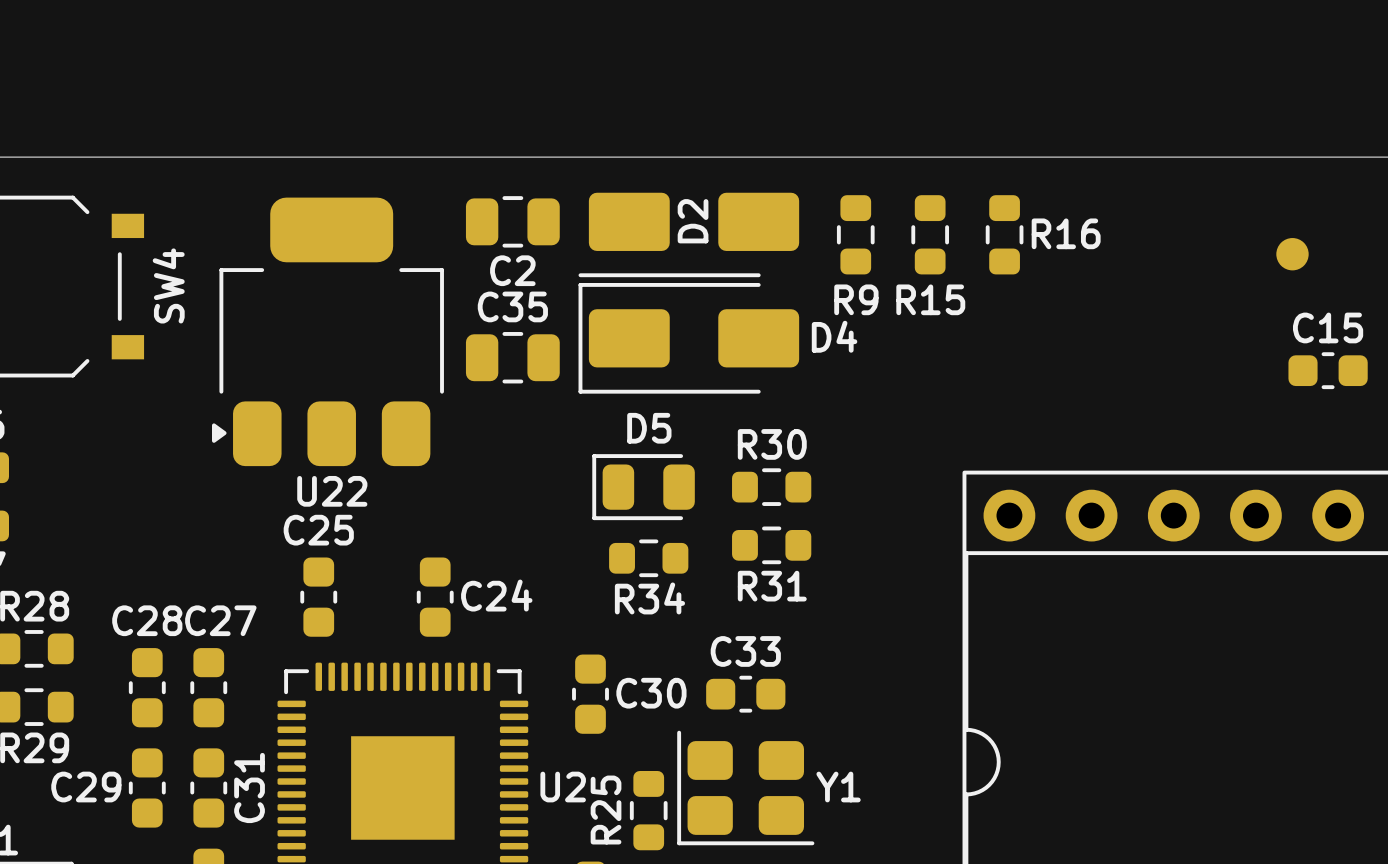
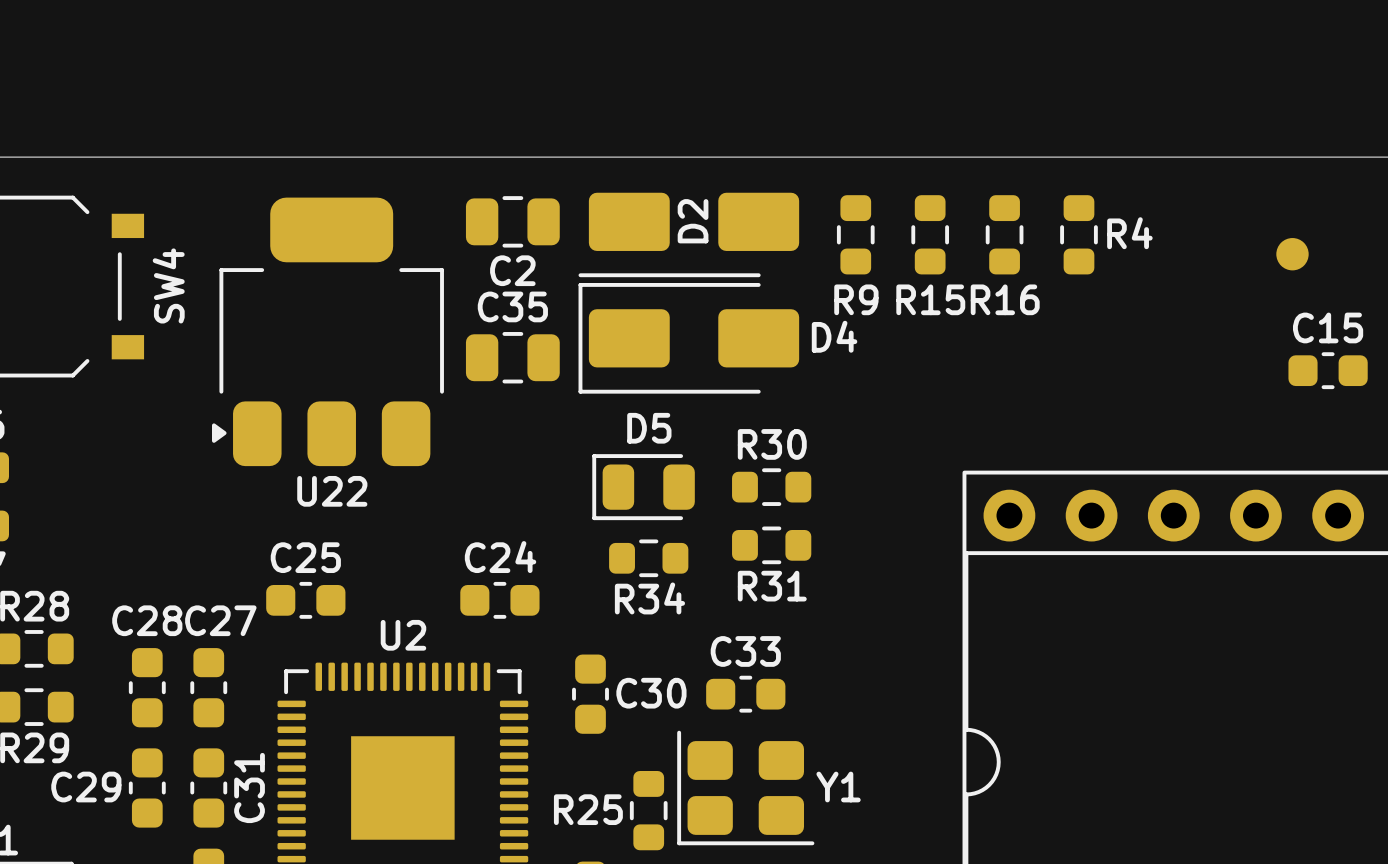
R16 name position: R16 (1066, 233) -> R16 (1005, 299)
R4: none -> (1078, 234)
C24 name position: C24 (496, 595) -> C24 (500, 557)
C25 rotation: 0° (318, 597) -> 90° clockwise (305, 600)
C24 rotation: 0° (435, 597) -> 90° clockwise (499, 600)
C24 position: (435, 597) -> (499, 600)
U2 name position: U2 (563, 787) -> U2 (403, 635)
R25 name rotation: 0° (606, 810) -> 90° clockwise (588, 809)

